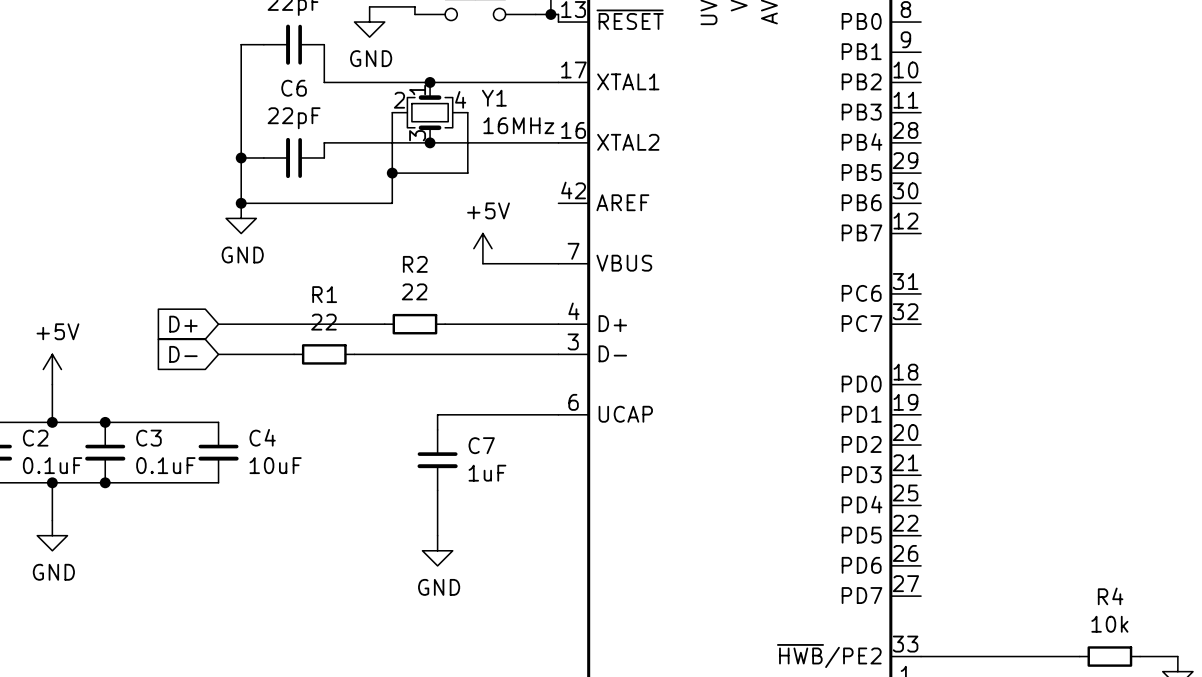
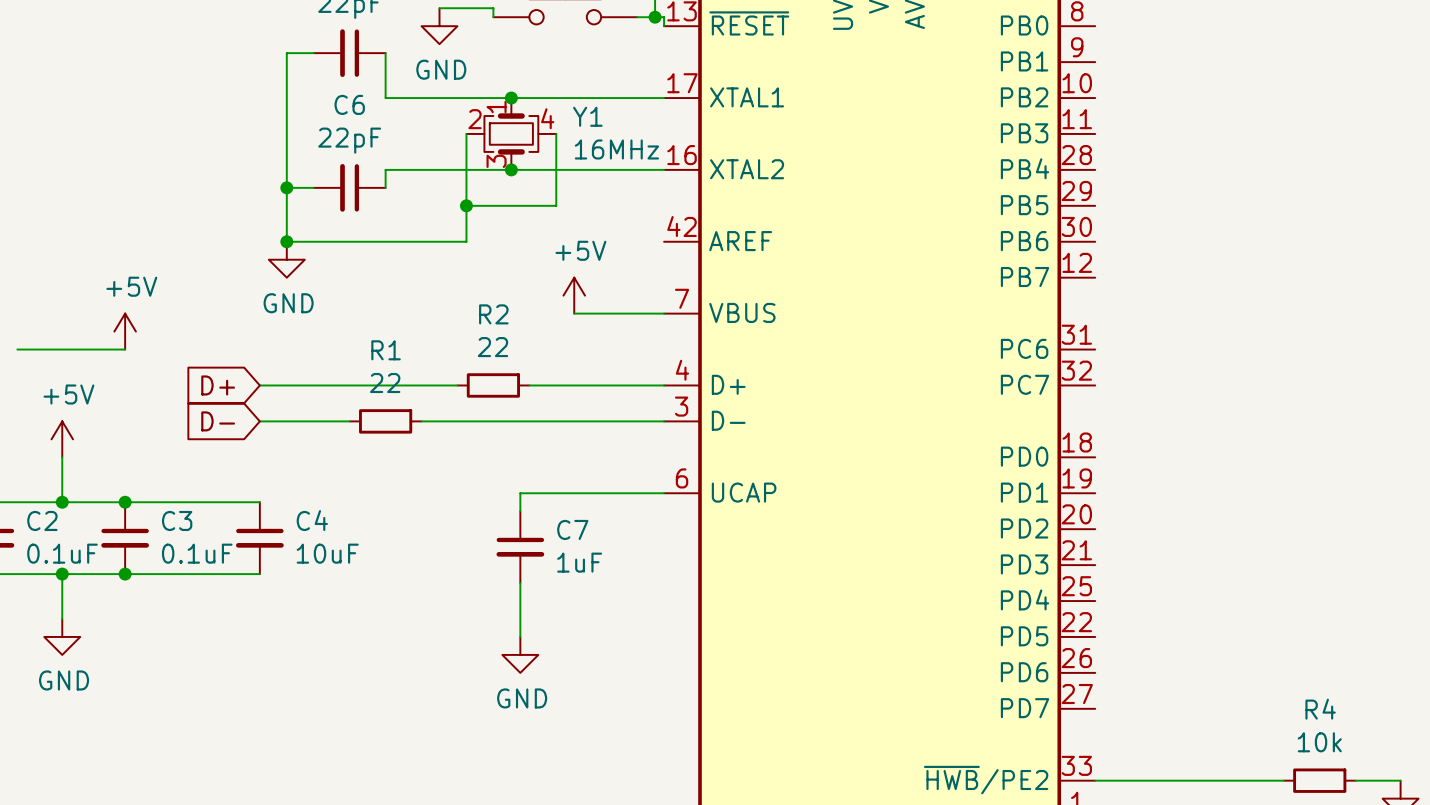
power symbol: none -> +5V (125, 331)
wire: none -> (17, 349) (125, 349)

